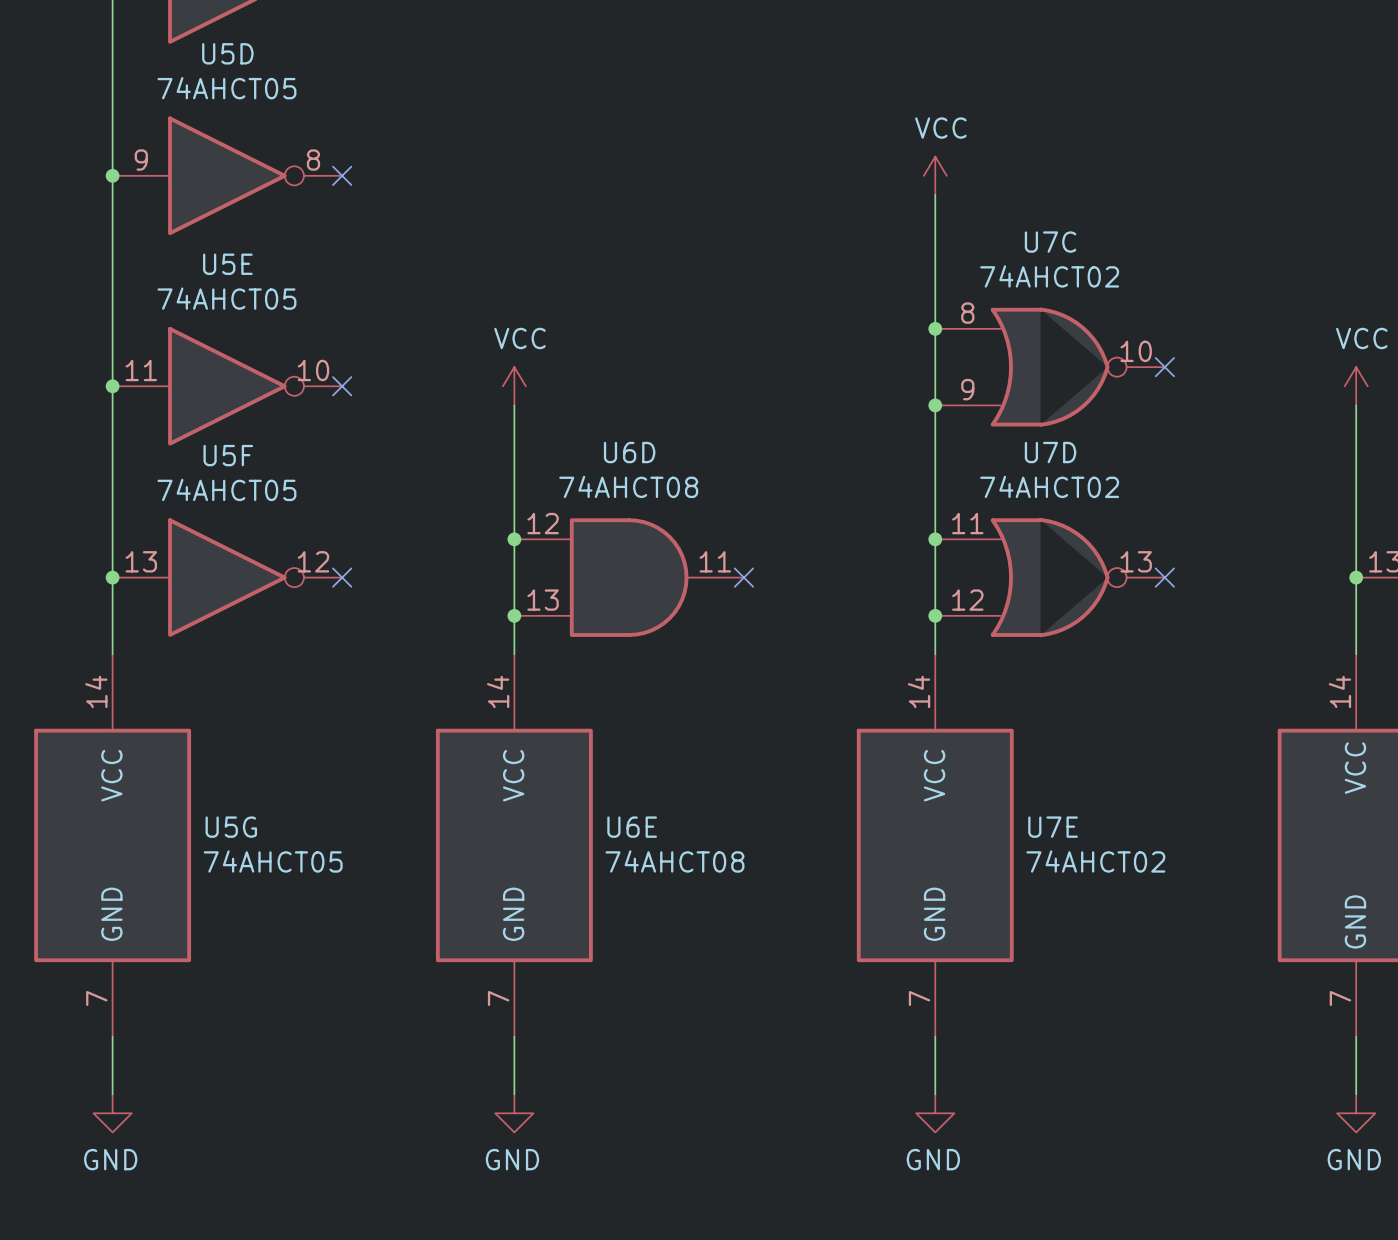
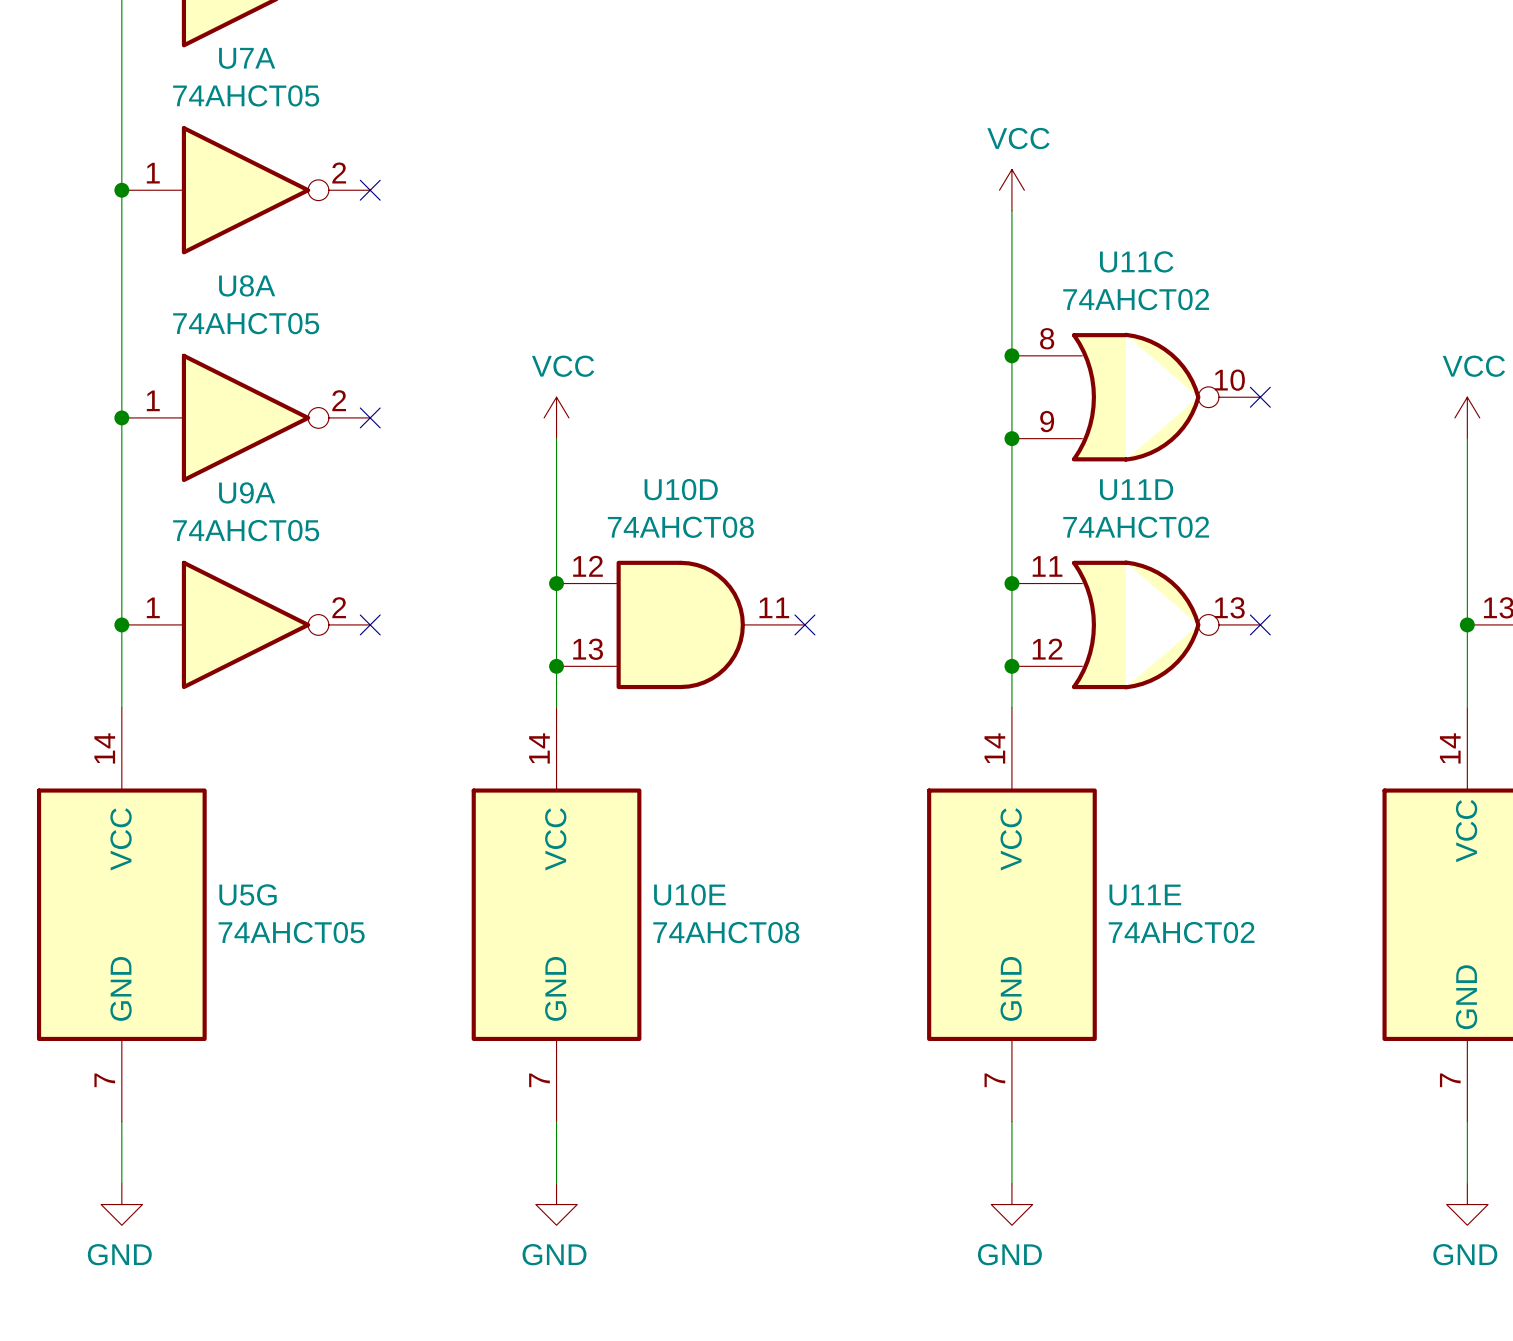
U5D name: U5D (227, 53) -> U7A (247, 58)
U5D pin number: 9 (141, 160) -> 1 (153, 173)
U5D pin number: 8 (313, 160) -> 2 (339, 173)
U7C name: U7C (1050, 242) -> U11C (1136, 261)
U5E name: U5E (227, 264) -> U8A (247, 285)
U5E pin number: 11 (141, 370) -> 1 (153, 400)
U5E pin number: 10 (313, 370) -> 2 (339, 400)
U6D name: U6D (629, 452) -> U10D (681, 489)
U7D name: U7D (1050, 452) -> U11D (1136, 489)
U5F name: U5F (228, 455) -> U9A (247, 492)
U5F pin number: 13 (141, 561) -> 1 (153, 607)
U5F pin number: 12 (313, 561) -> 2 (339, 607)
U6E name: U6E (632, 827) -> U10E (689, 894)
U7E name: U7E (1053, 827) -> U11E (1145, 895)

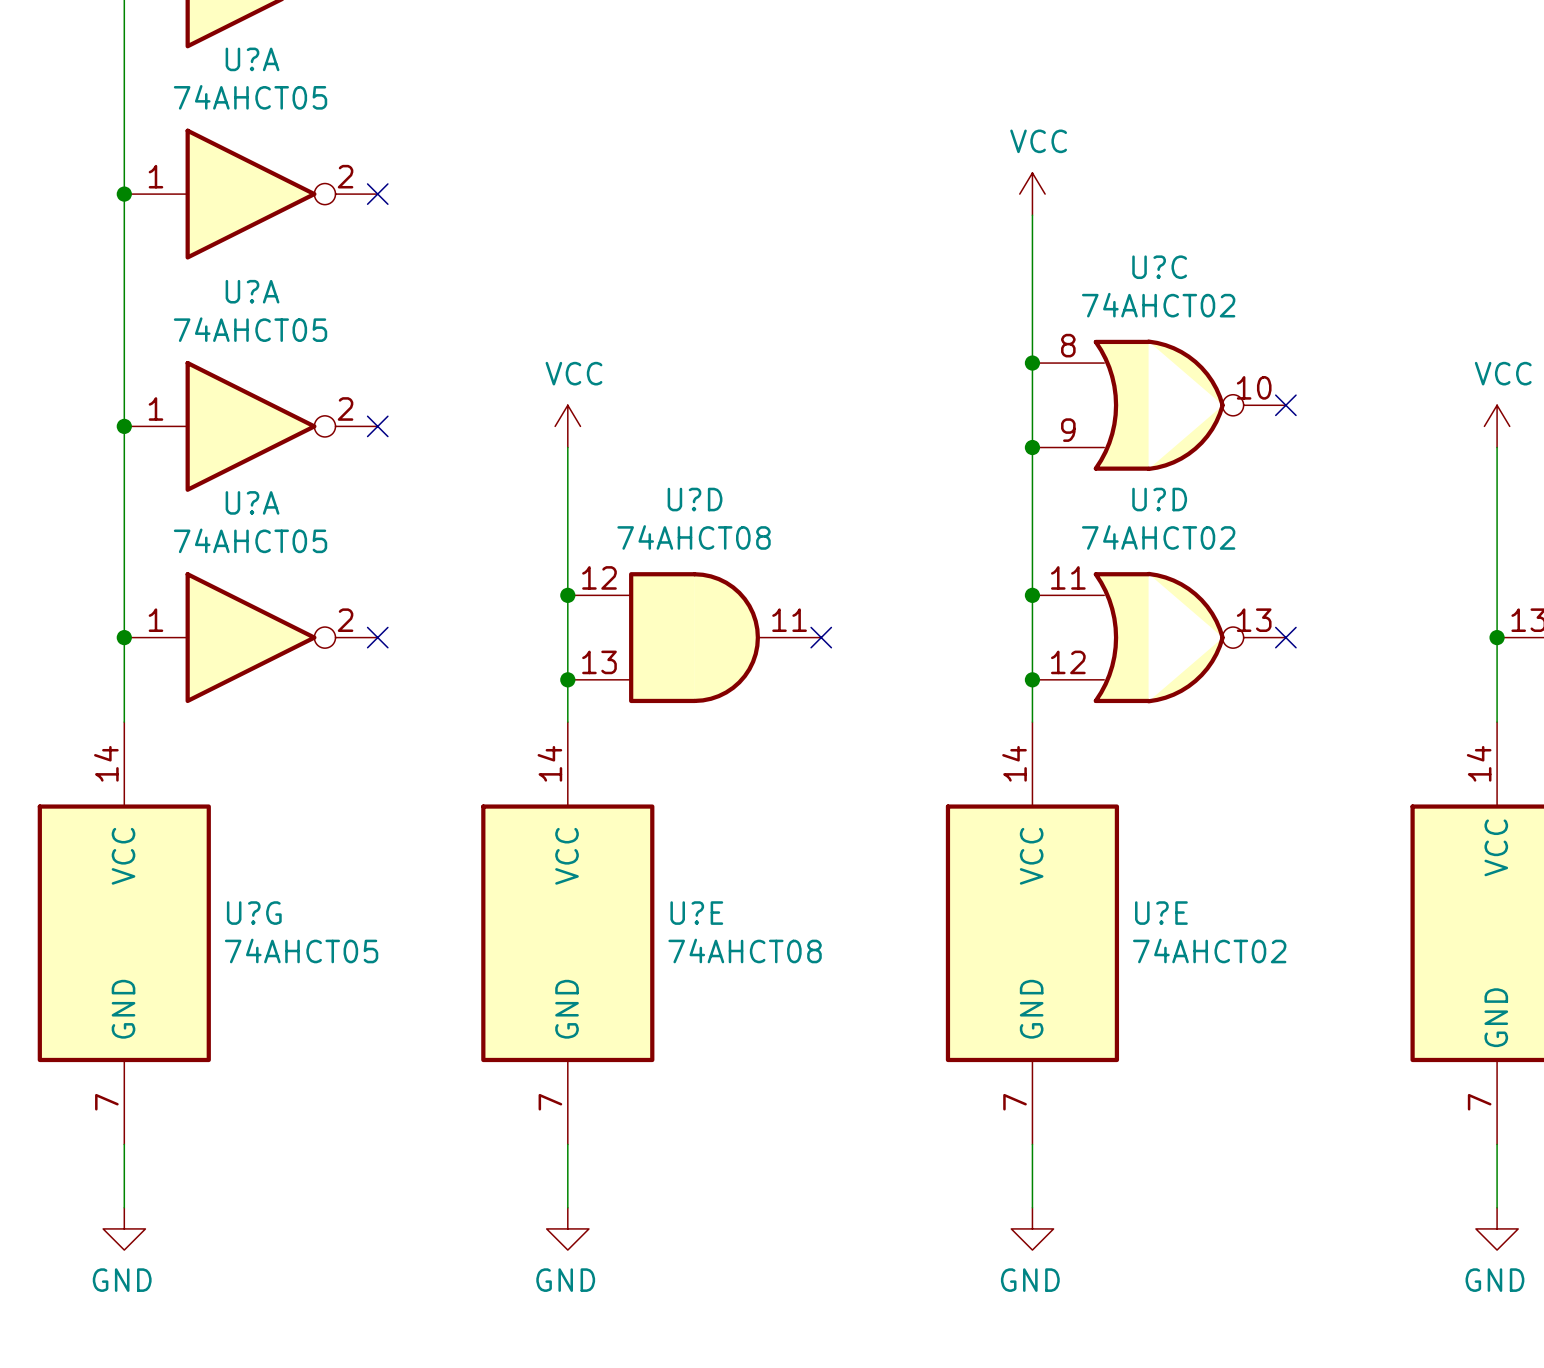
U7A name: U7A (247, 58) -> U?A (252, 59)
U11C name: U11C (1136, 261) -> U?C (1159, 267)
U8A name: U8A (247, 285) -> U?A (252, 291)
U10D name: U10D (681, 489) -> U?D (695, 499)
U11D name: U11D (1136, 489) -> U?D (1159, 499)
U9A name: U9A (247, 492) -> U?A (252, 502)
U5G name: U5G (248, 894) -> U?G (254, 913)
U10E name: U10E (689, 894) -> U?E (696, 913)
U11E name: U11E (1145, 895) -> U?E (1161, 913)

